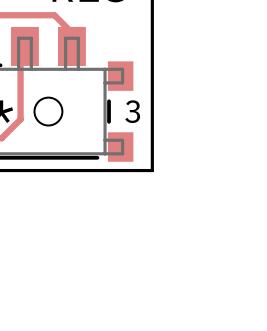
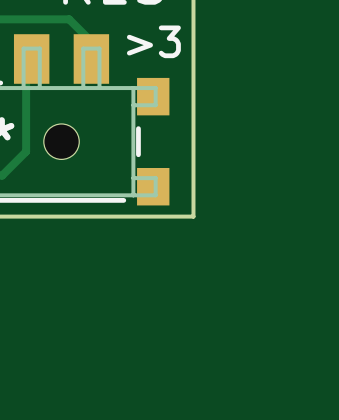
text: none -> >3 (153, 41)
text: 3 (132, 111) -> none

